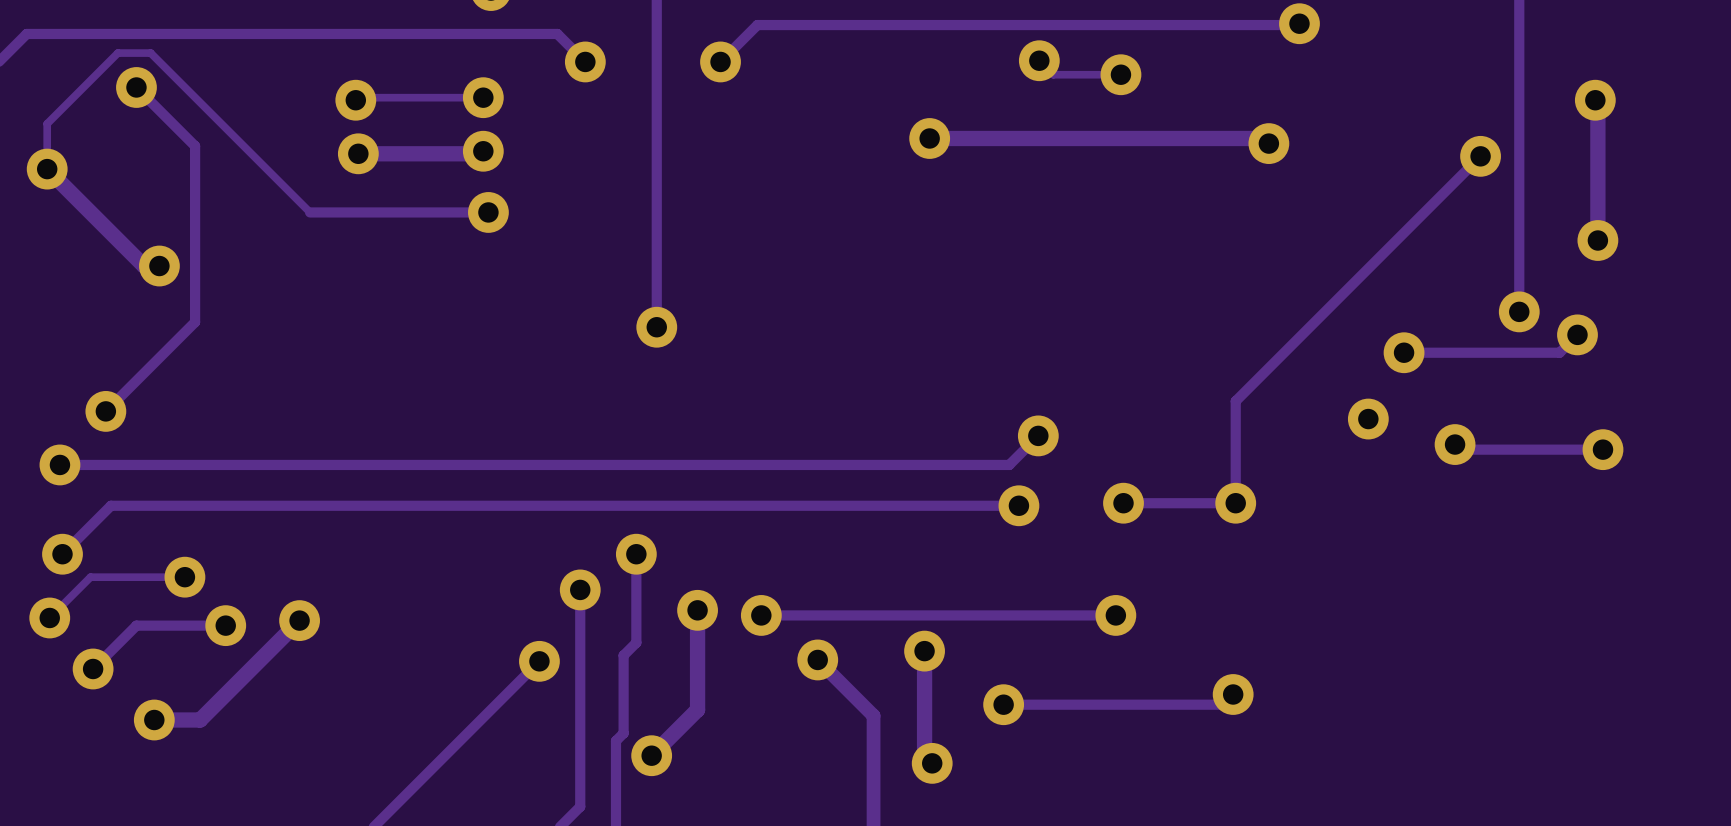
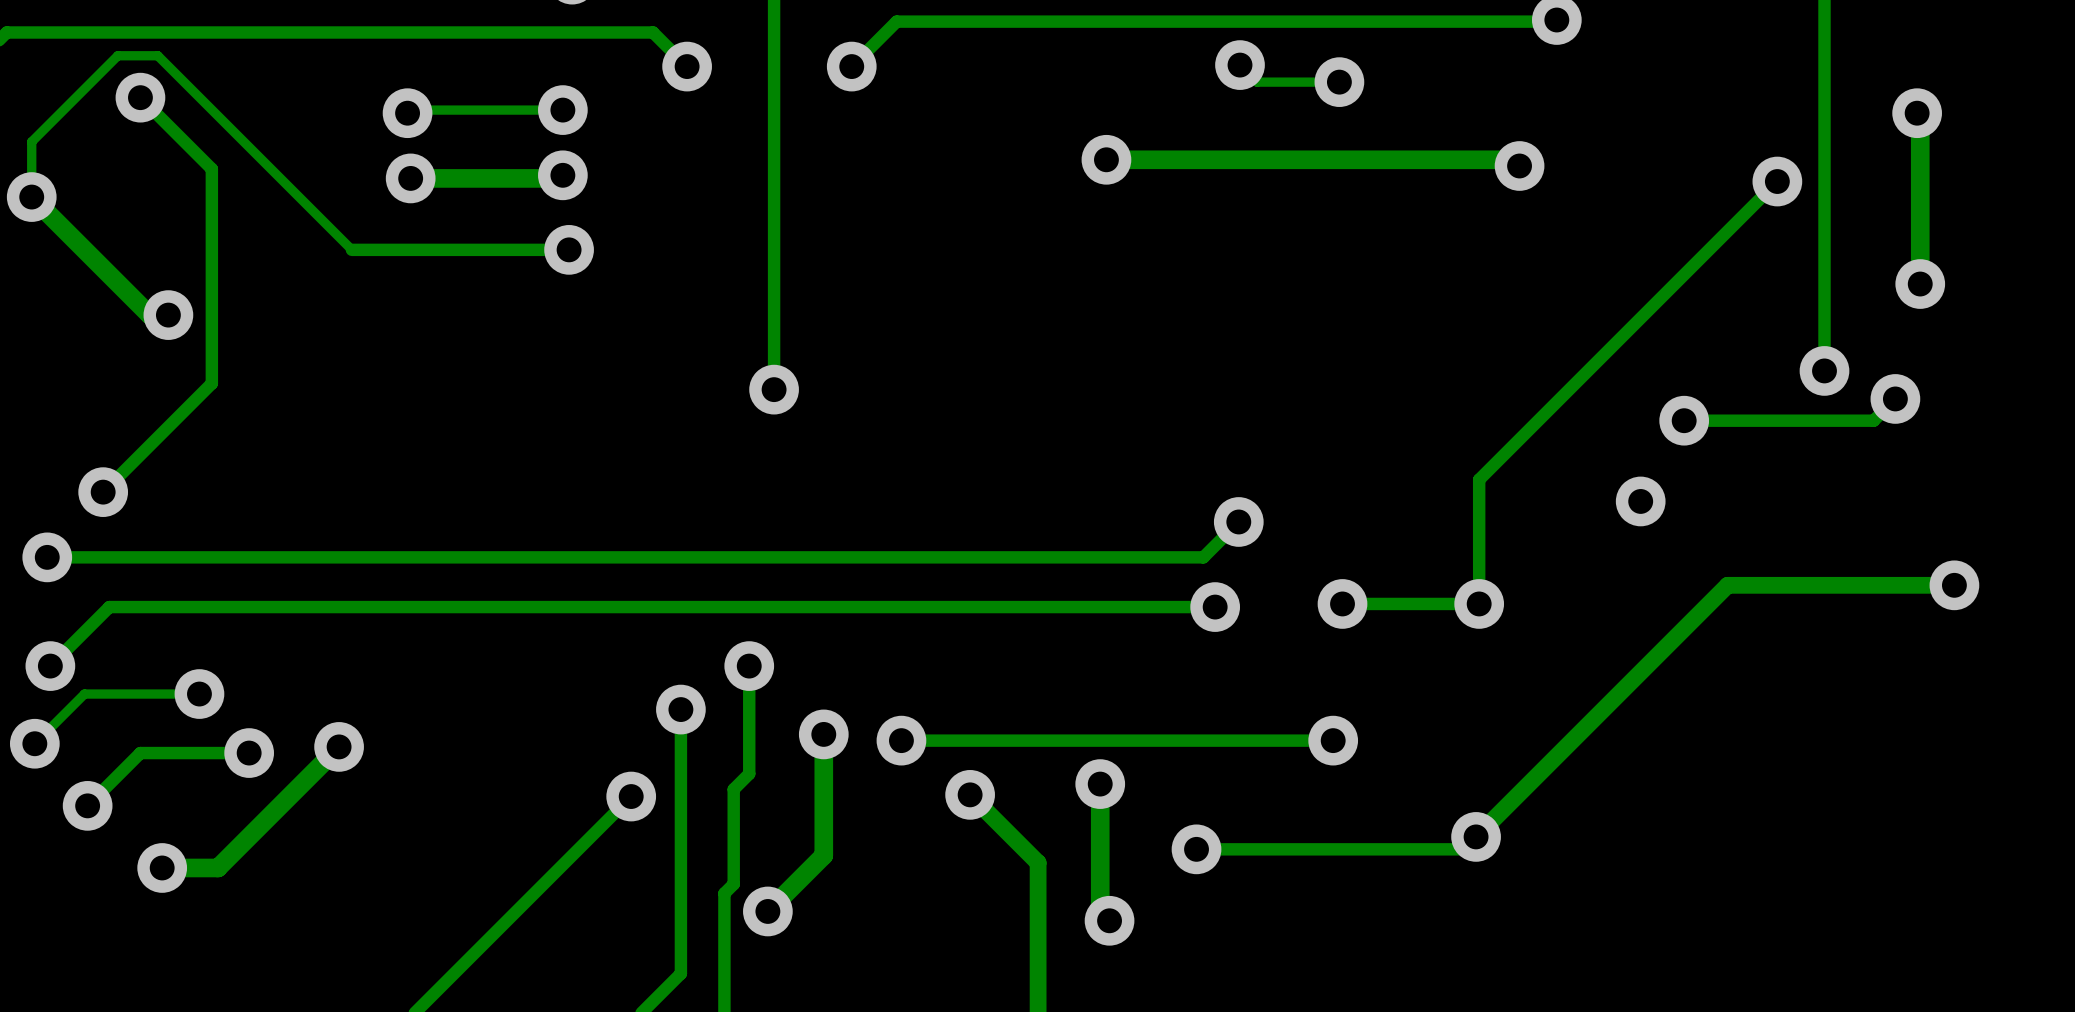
track: (1455, 444) (1460, 449) (1602, 449) -> none
via: (1455, 444) -> none
via position: (1602, 449) -> (1954, 585)
track: none -> (1954, 585) (1727, 585) (1476, 836)

